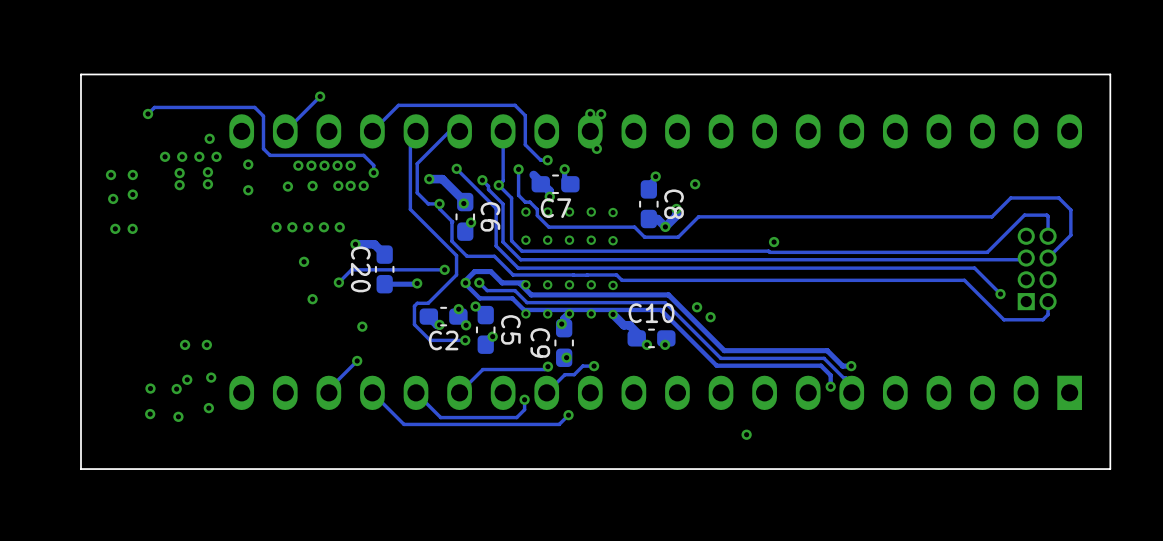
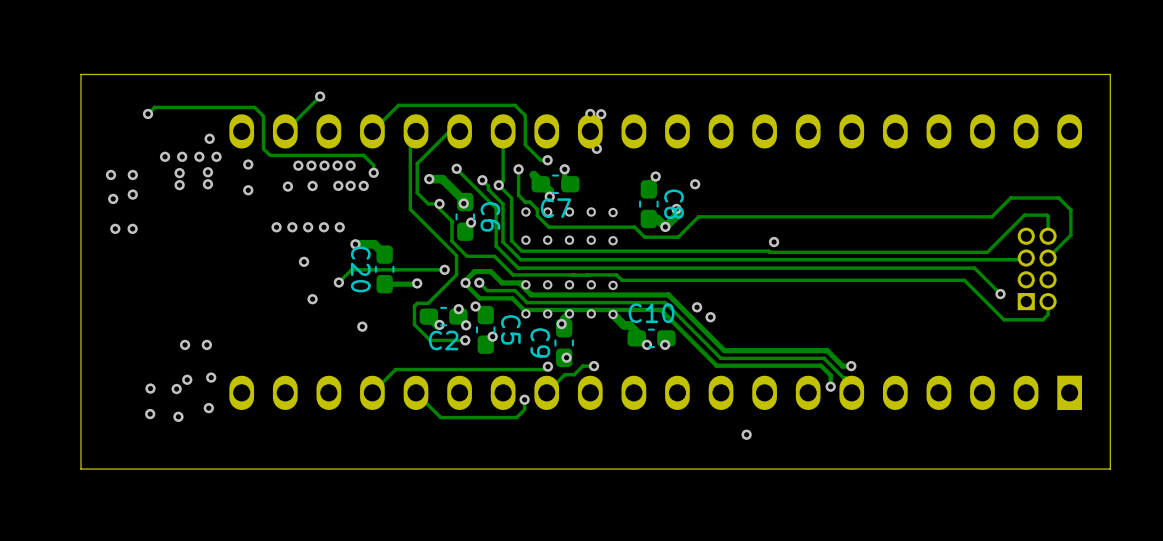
track: (357, 360) (328, 389) (328, 392) -> none
via: (357, 360) -> none
track: (482, 369) (459, 392) -> (482, 369) (395, 369) (372, 392)
track: (372, 392) (404, 424) (559, 424) (568, 415) -> none
via: (568, 415) -> none

